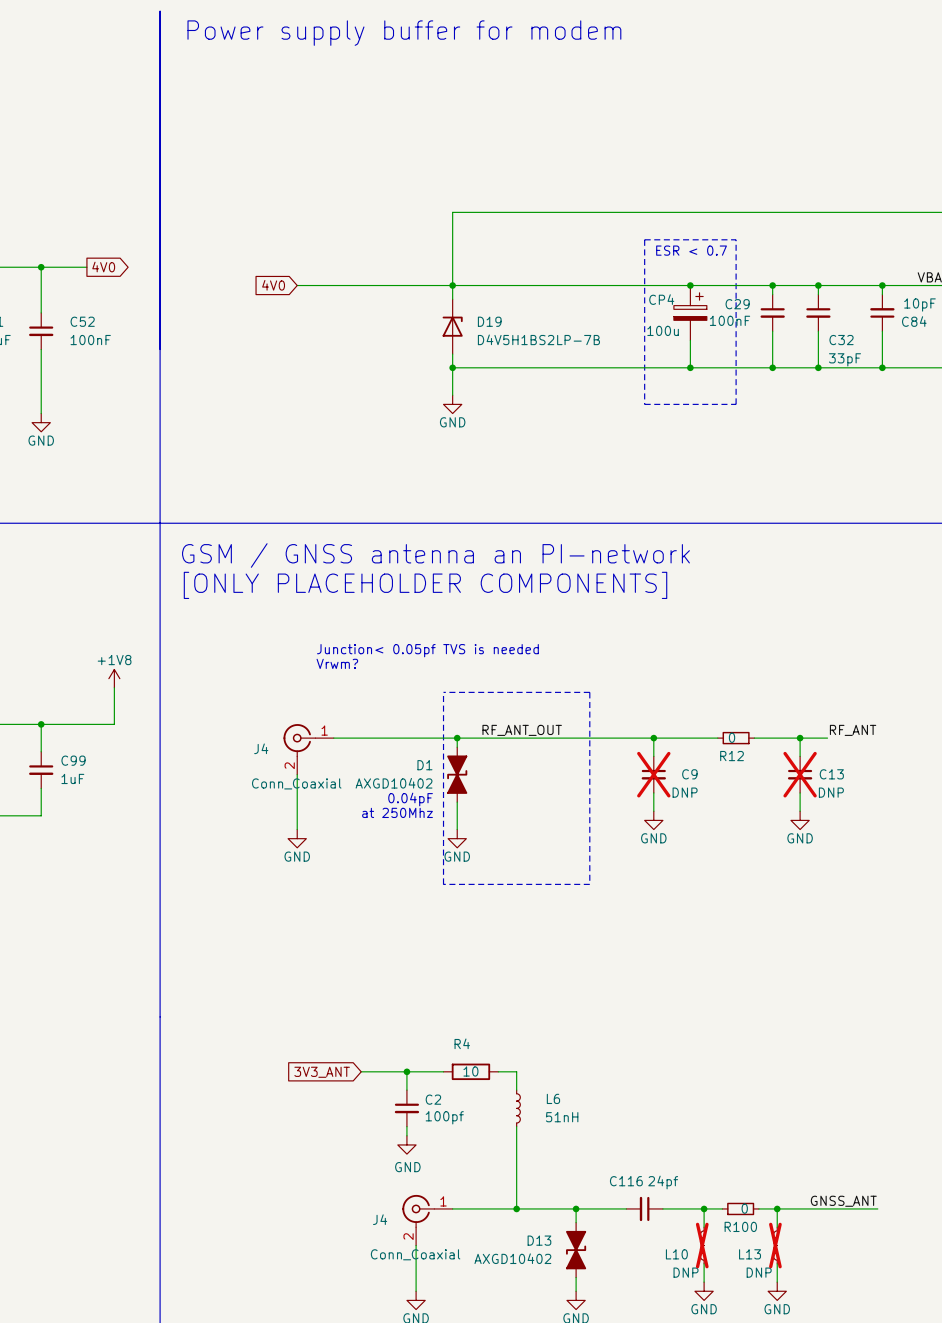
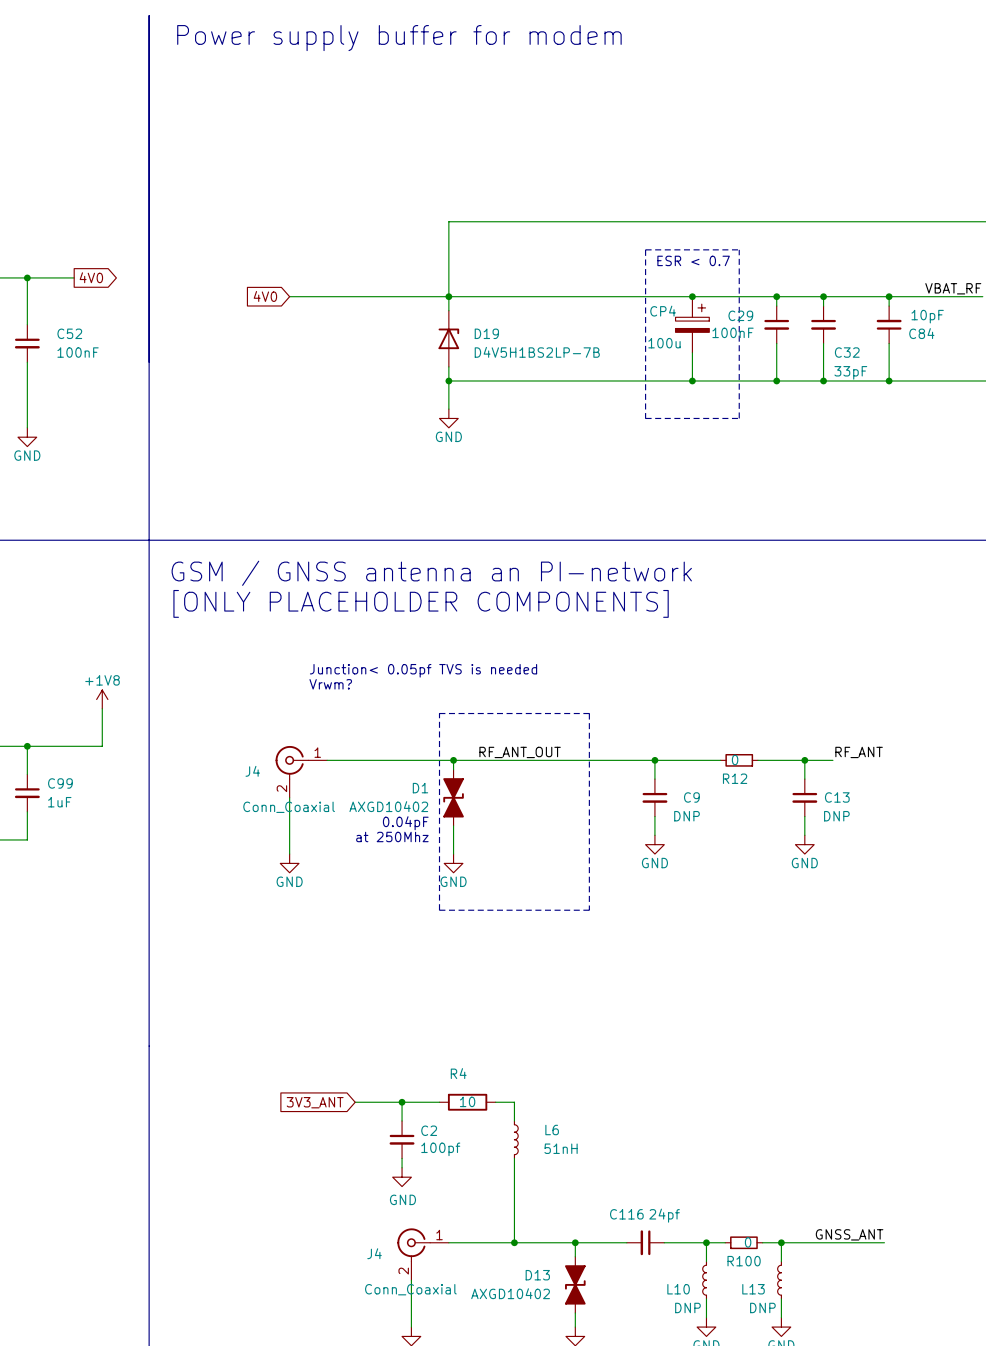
C9 do-not-place cross: (653, 774) -> none
C13 do-not-place cross: (800, 774) -> none
L10 do-not-place cross: (702, 1245) -> none
L13 do-not-place cross: (775, 1245) -> none

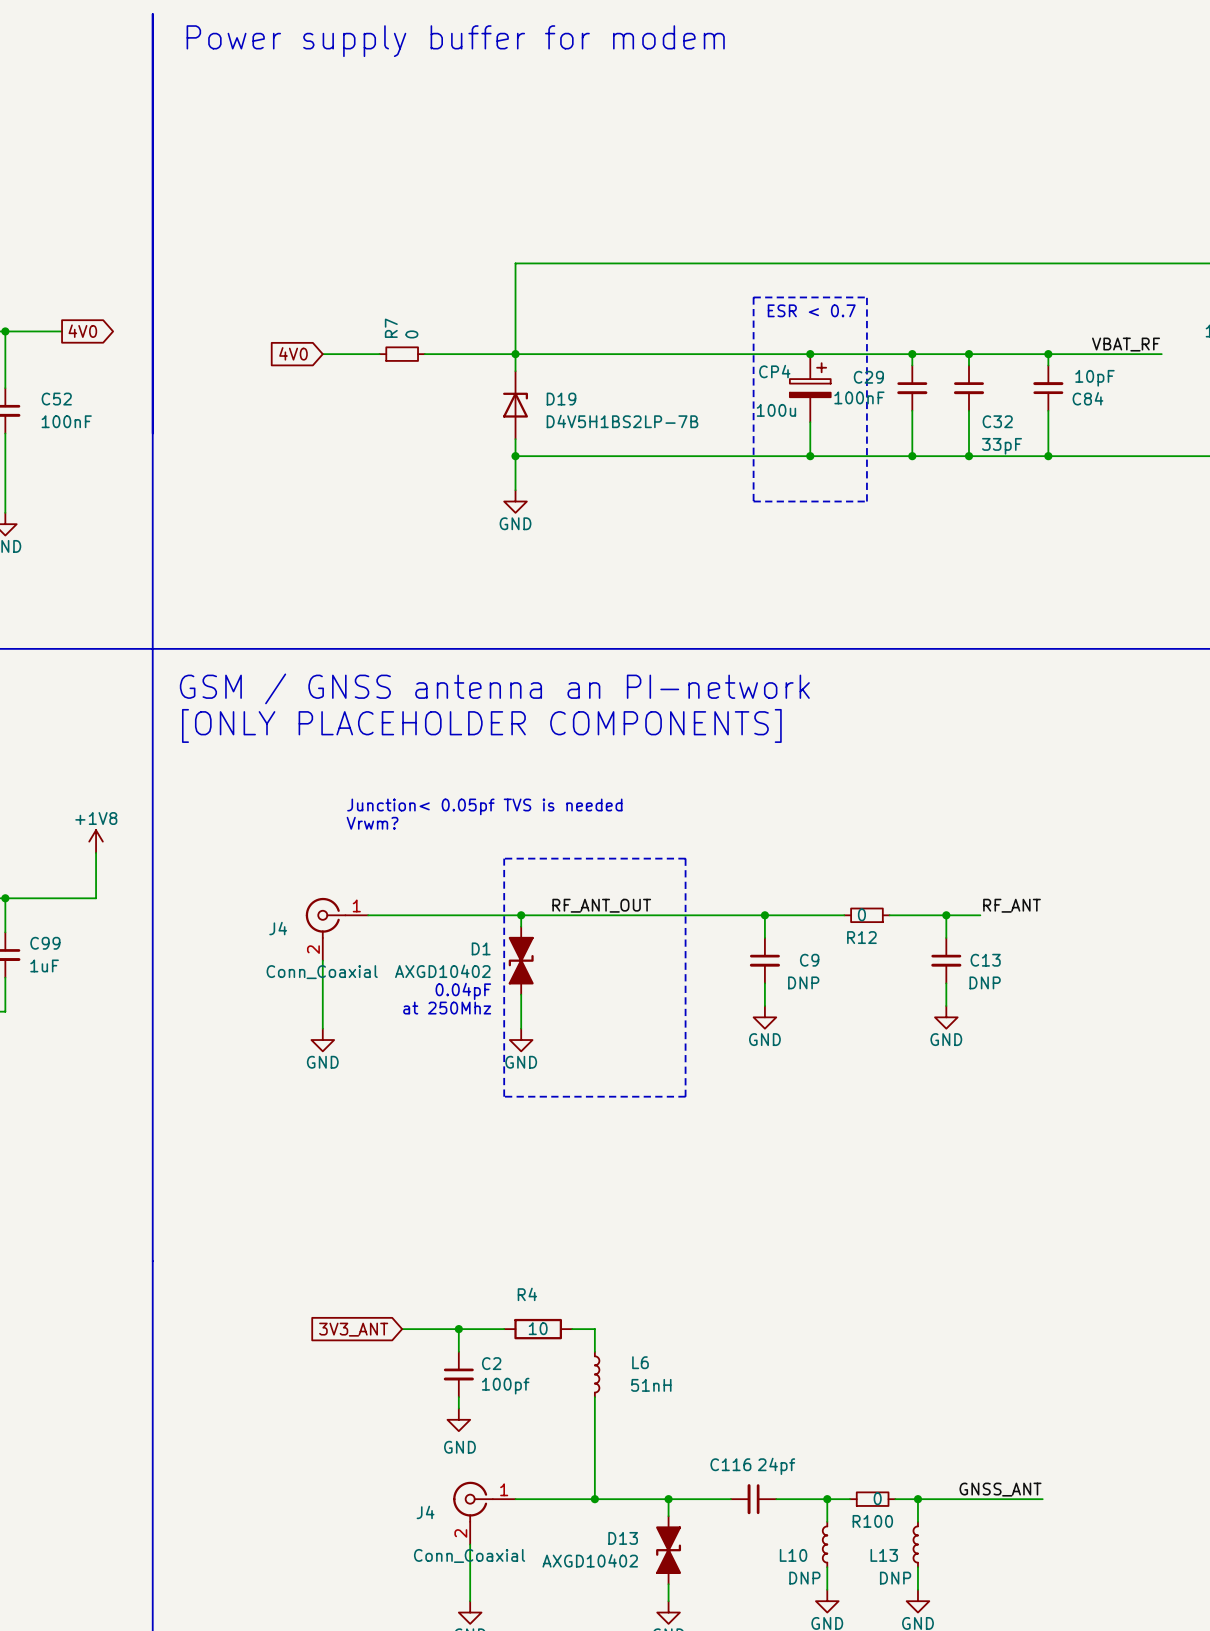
wire: (336, 296) (373, 296) -> none
R7: none -> 0 (402, 354)

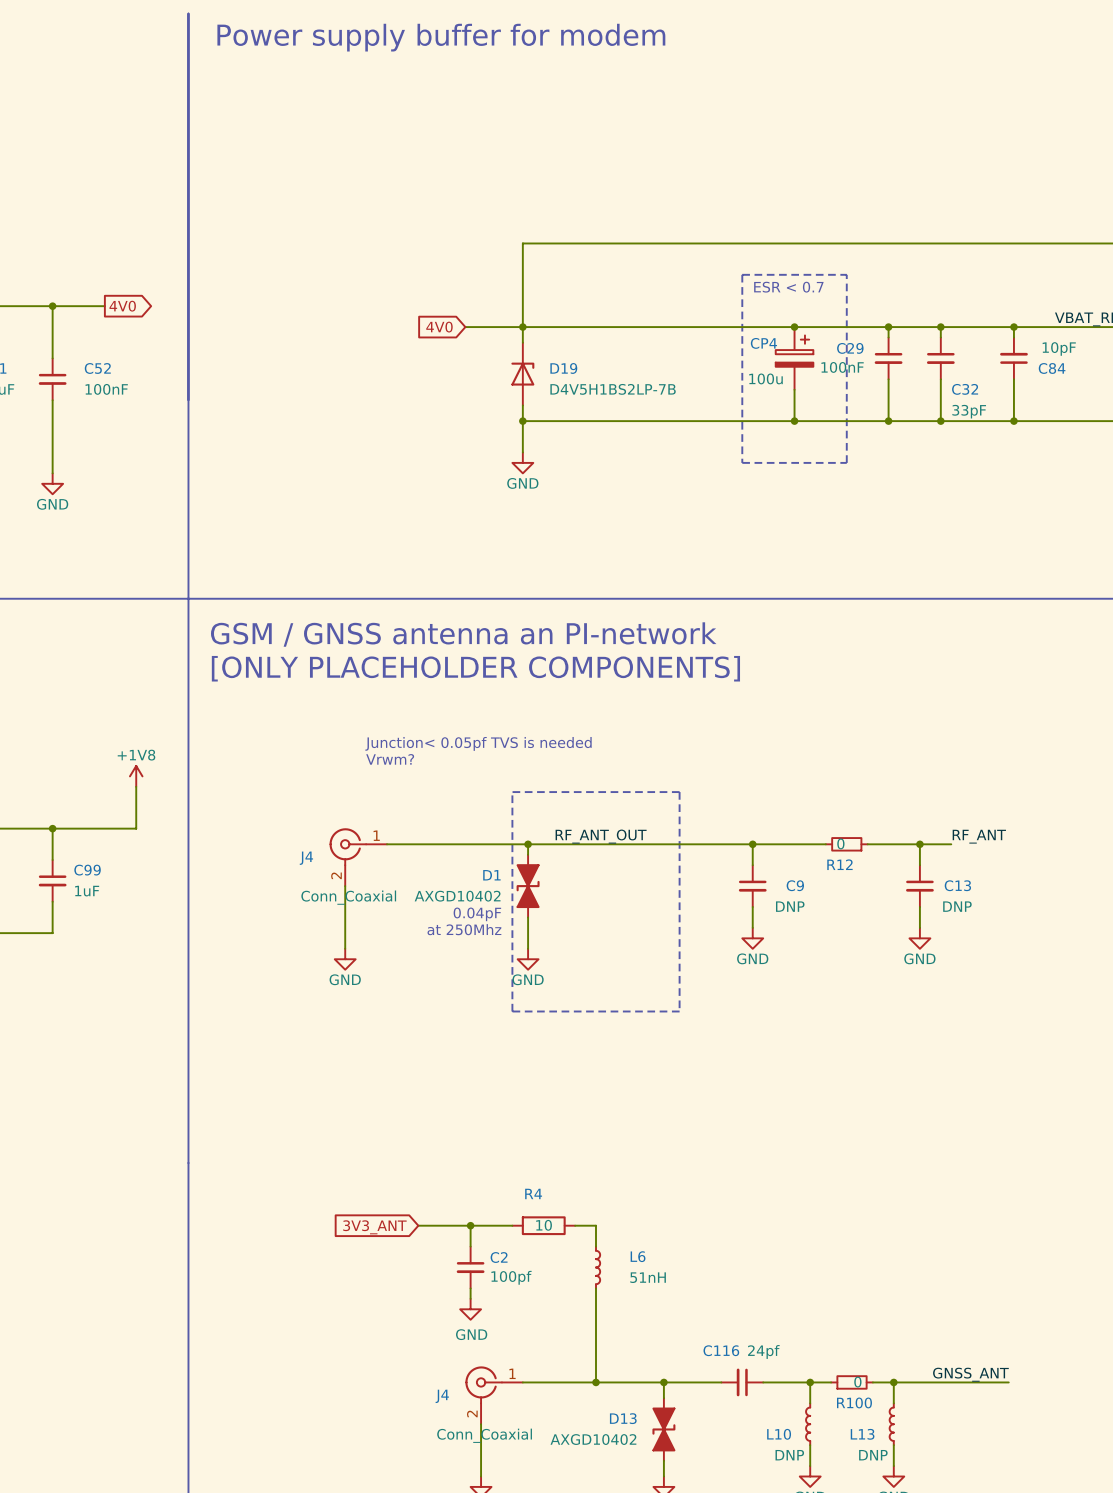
global label position: 4V0 (293, 353) -> 4V0 (439, 327)
wire: (322, 354) (379, 354) -> none
R7: 0 (402, 354) -> none
wire: (424, 354) (453, 354) -> none

